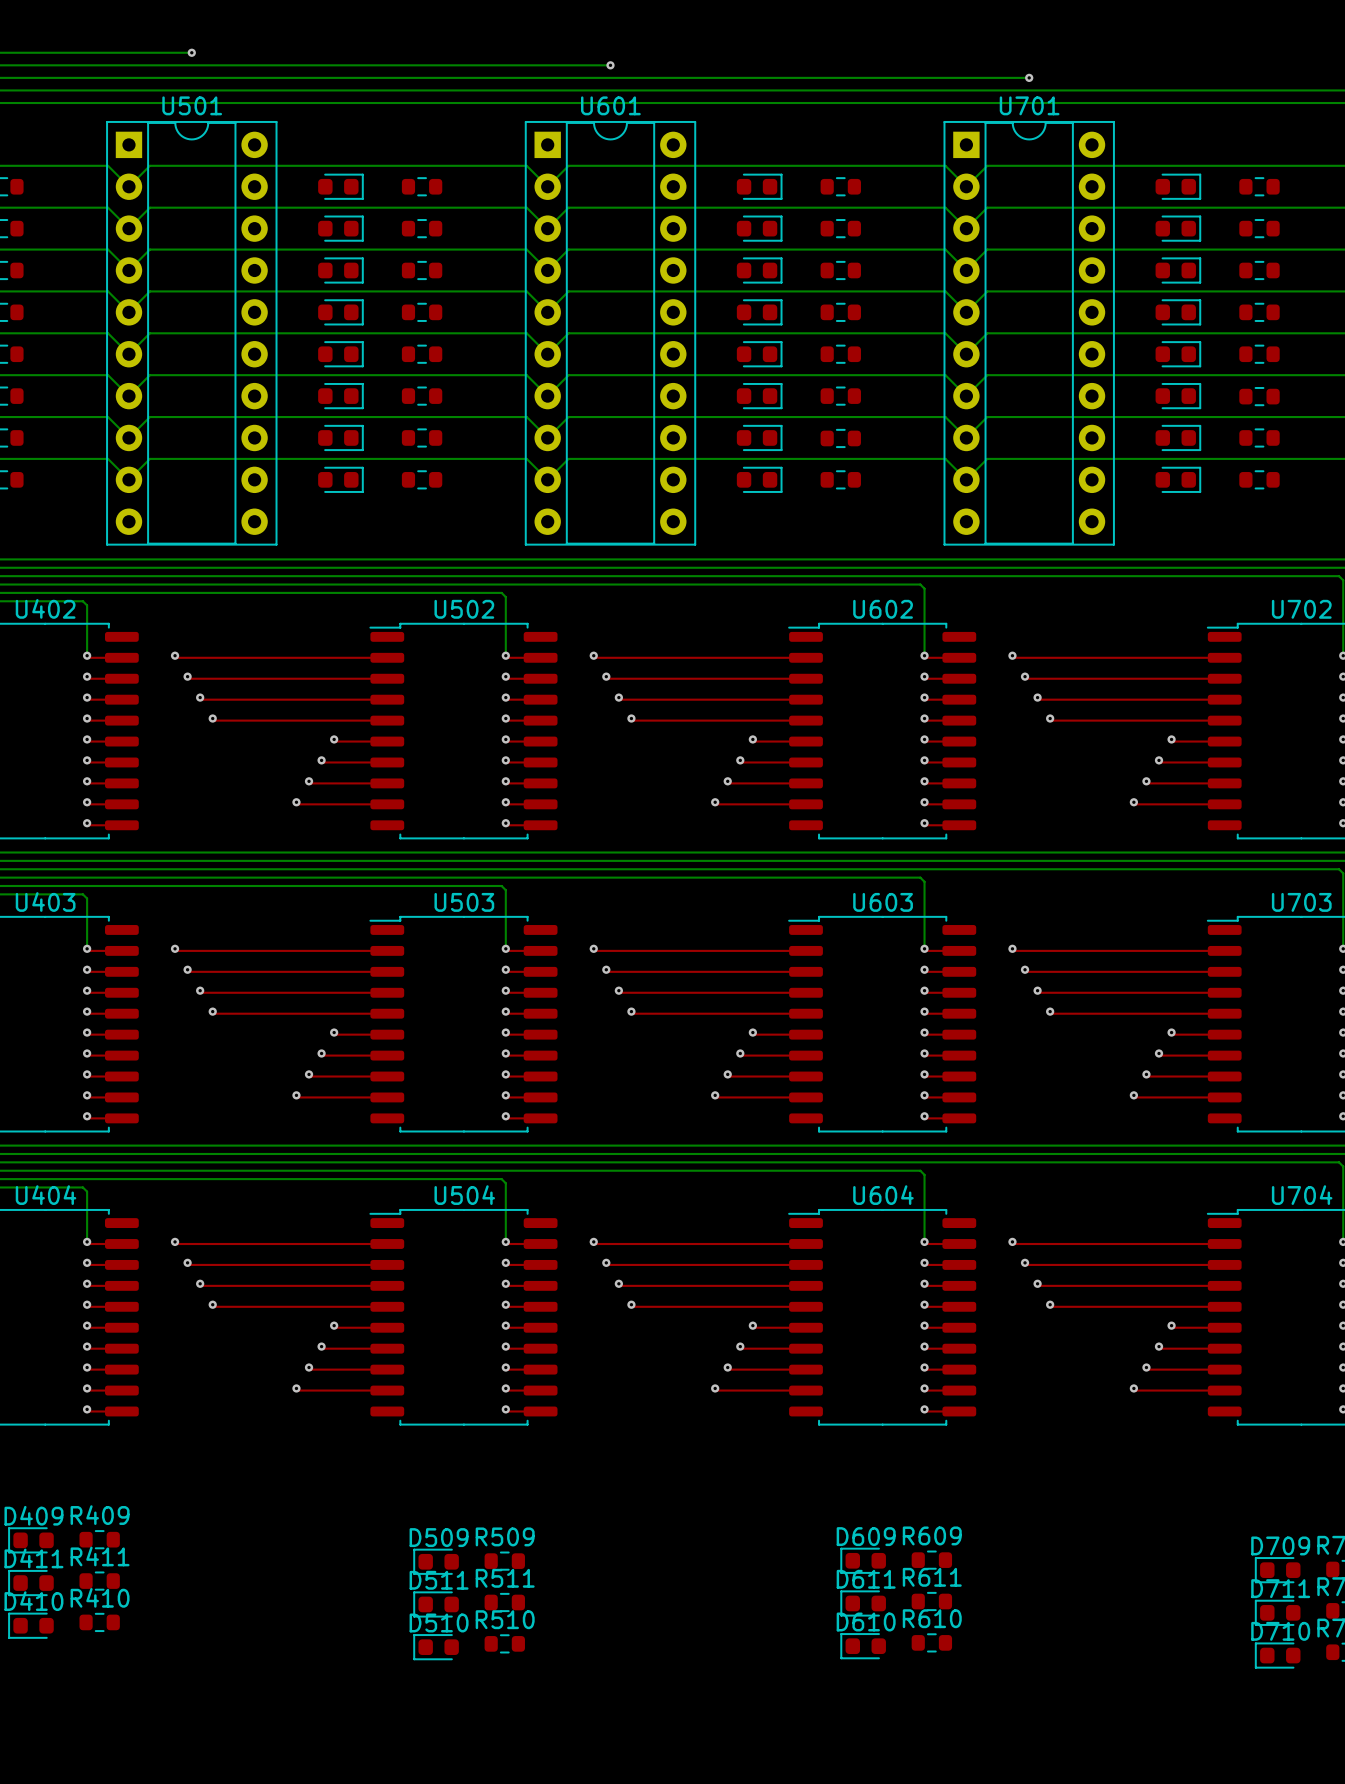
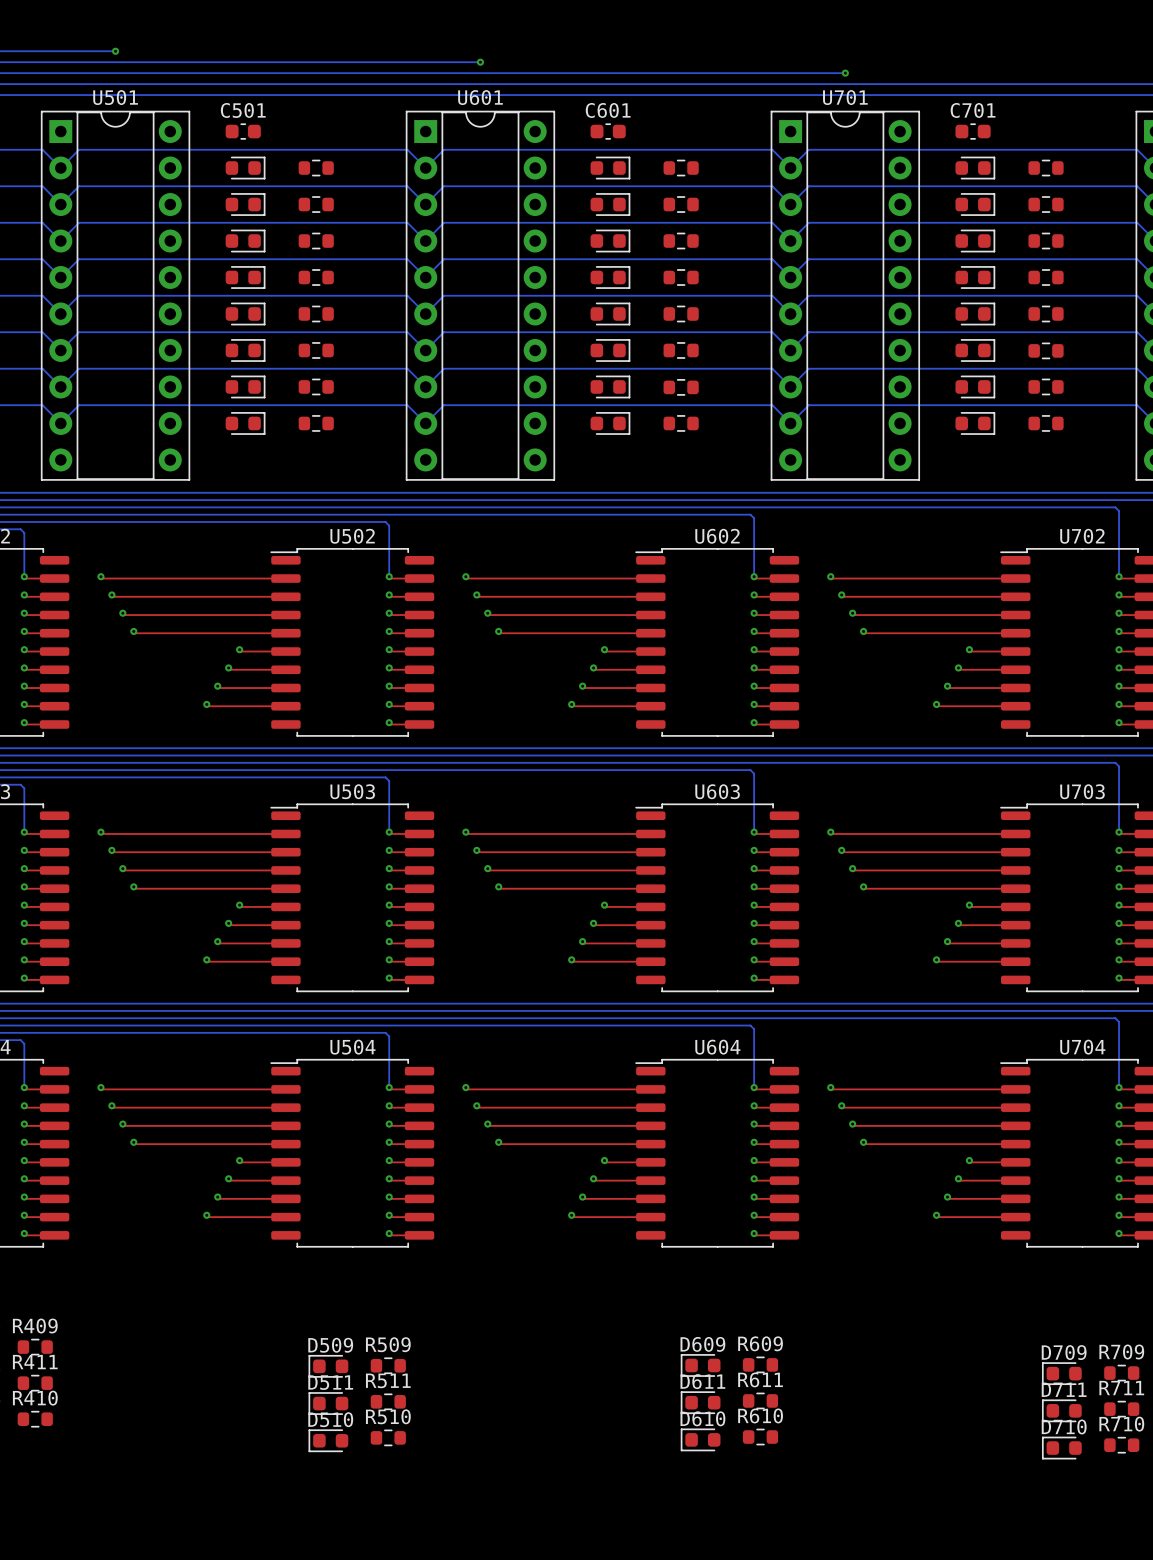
C501: none -> (243, 131)
C601: none -> (608, 131)
C701: none -> (973, 131)

